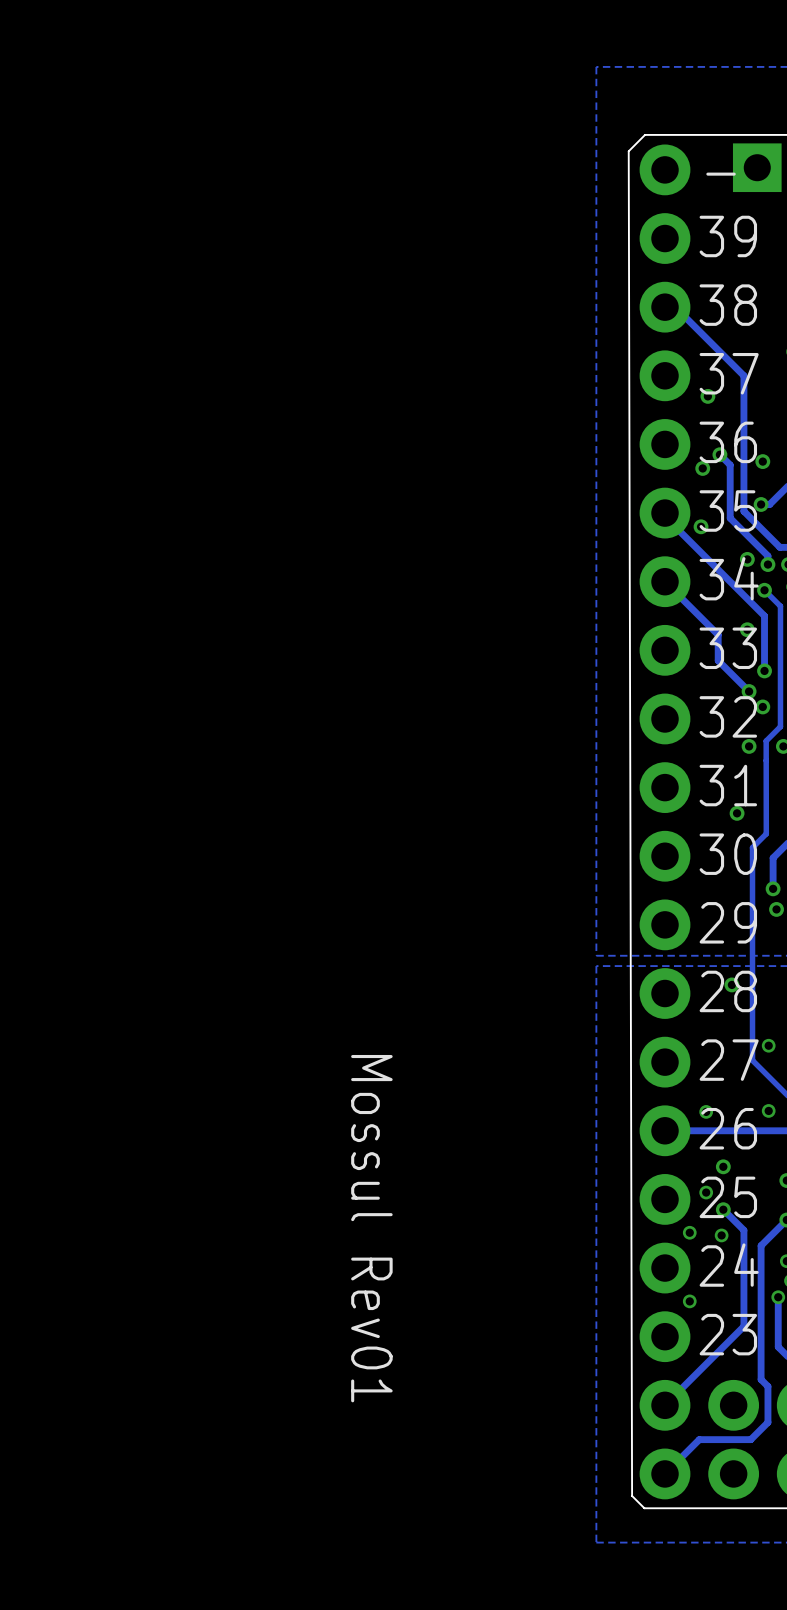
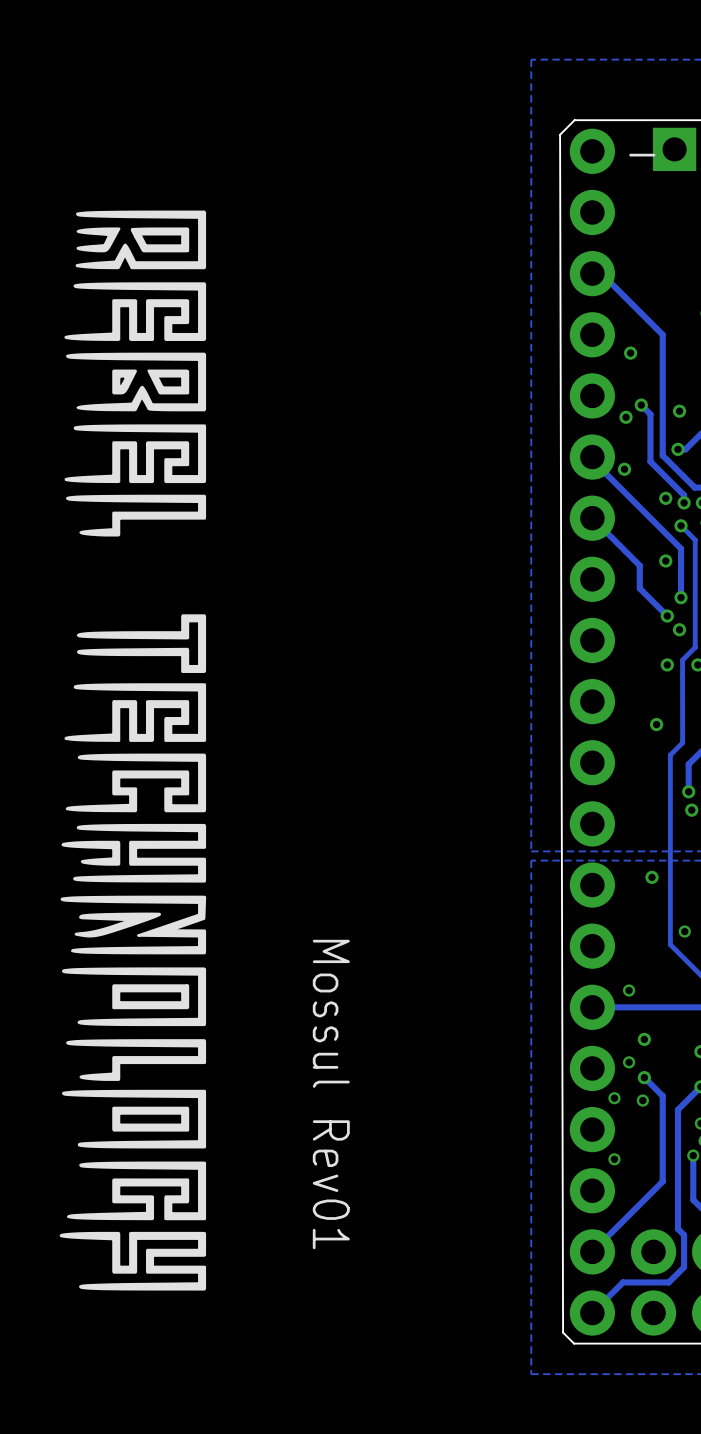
drawing: none -> [64, 210, 207, 537]
text: 39 (728, 236) -> none
text: 38 (728, 305) -> none
text: 37 (729, 373) -> none
text: 36 (728, 442) -> none
text: 35 (728, 511) -> none
text: 34 (729, 578) -> none
text: 33 (728, 648) -> none
drawing: none -> [59, 614, 207, 1291]
text: 32 (728, 716) -> none
text: 31 (728, 785) -> none
text: 30 (728, 854) -> none
text: 29 (728, 922) -> none
text: 28 (728, 991) -> none
text: 27 (729, 1060) -> none
via: (768, 1110) -> none
text: 26 (728, 1128) -> none
text: 25 (728, 1197) -> none
text: 24 (729, 1265) -> none
text: 23 (728, 1334) -> none

